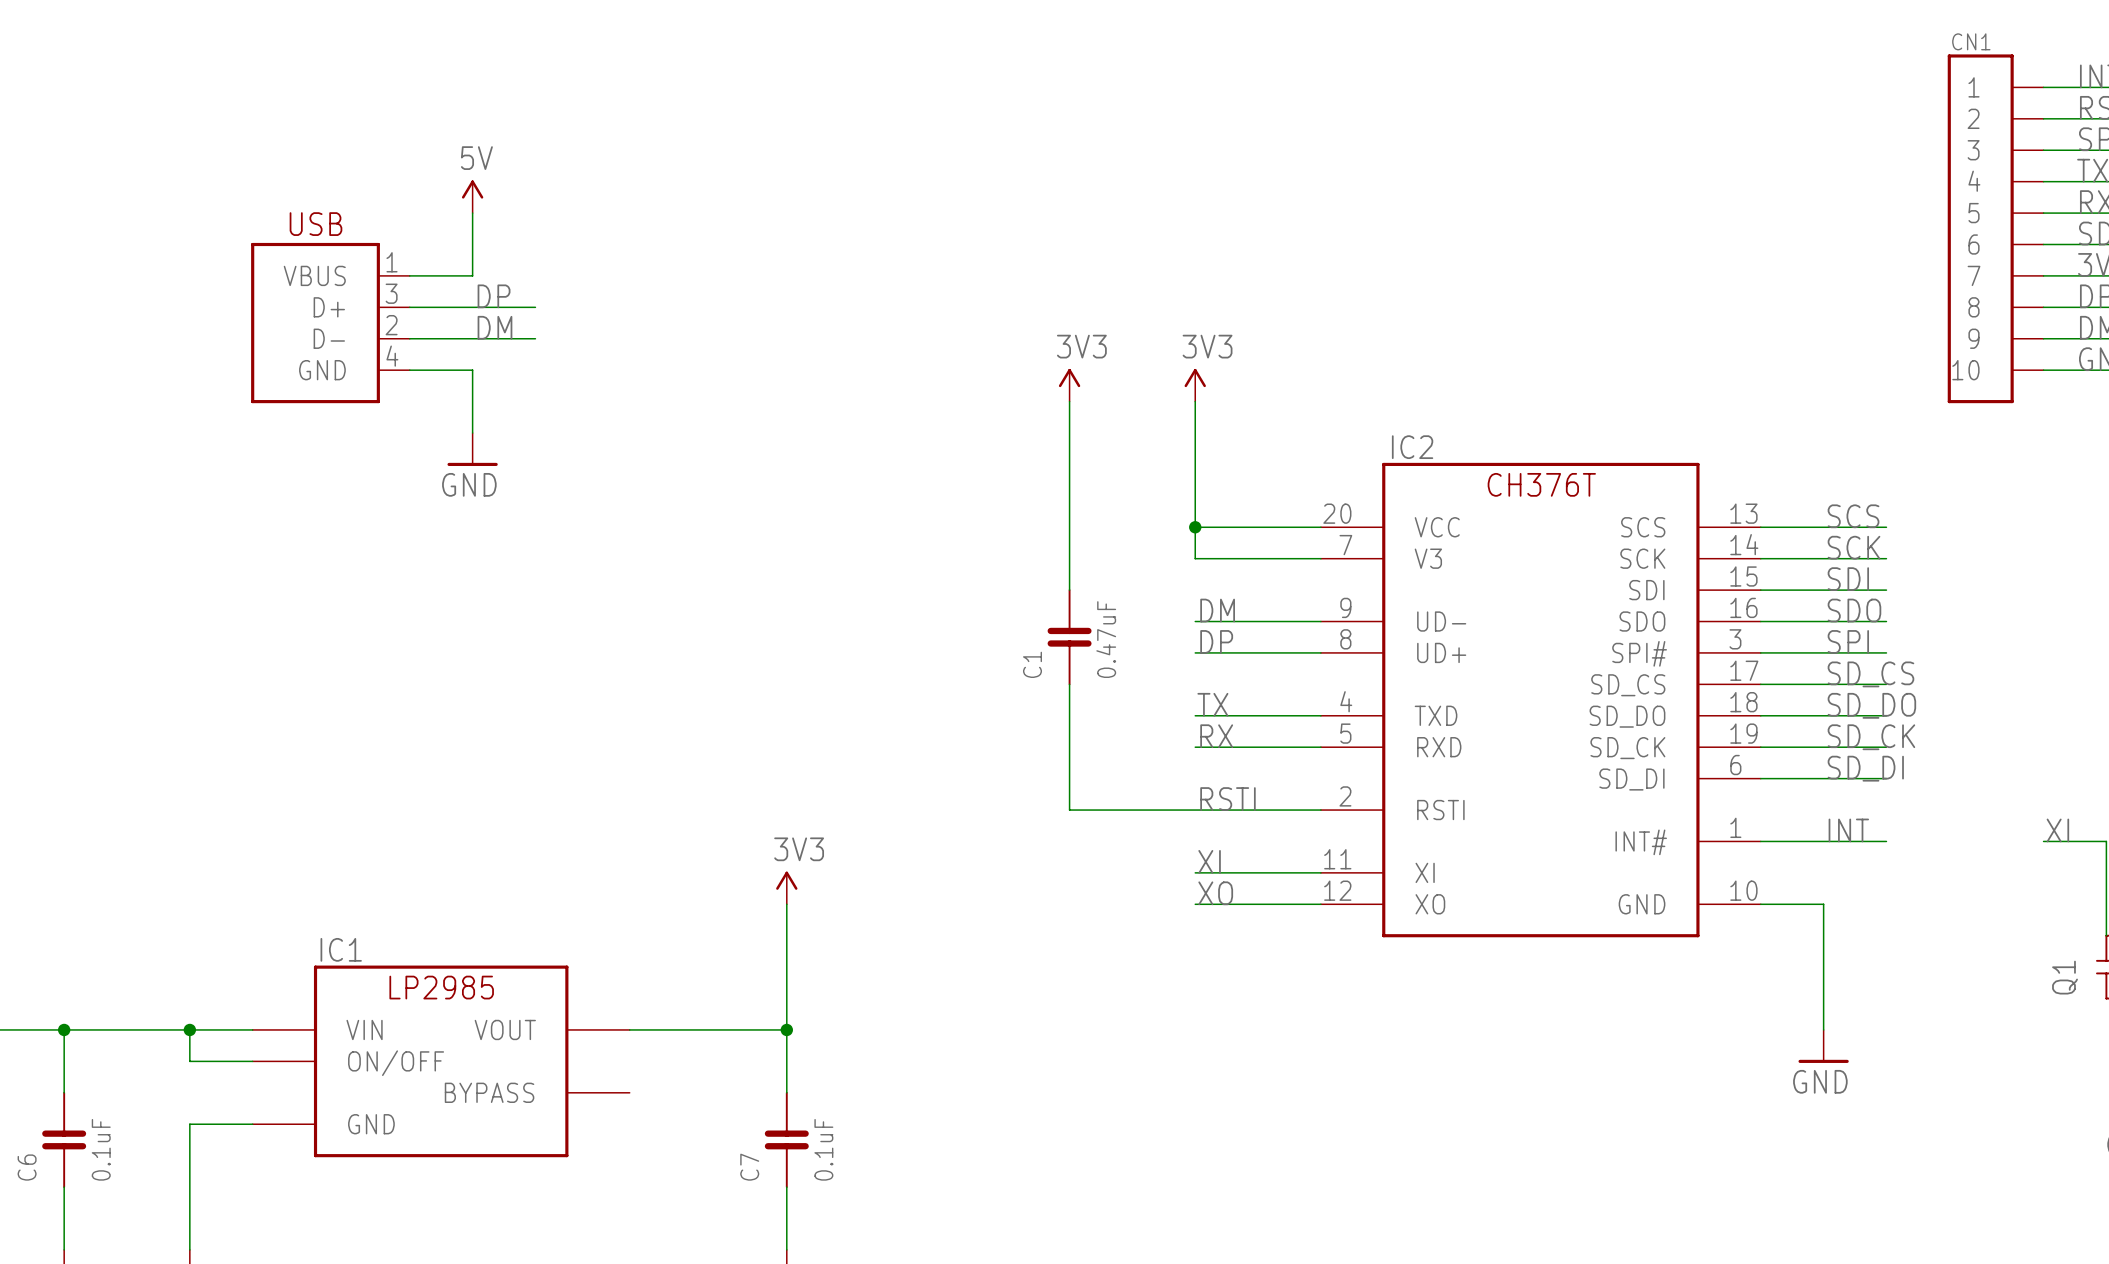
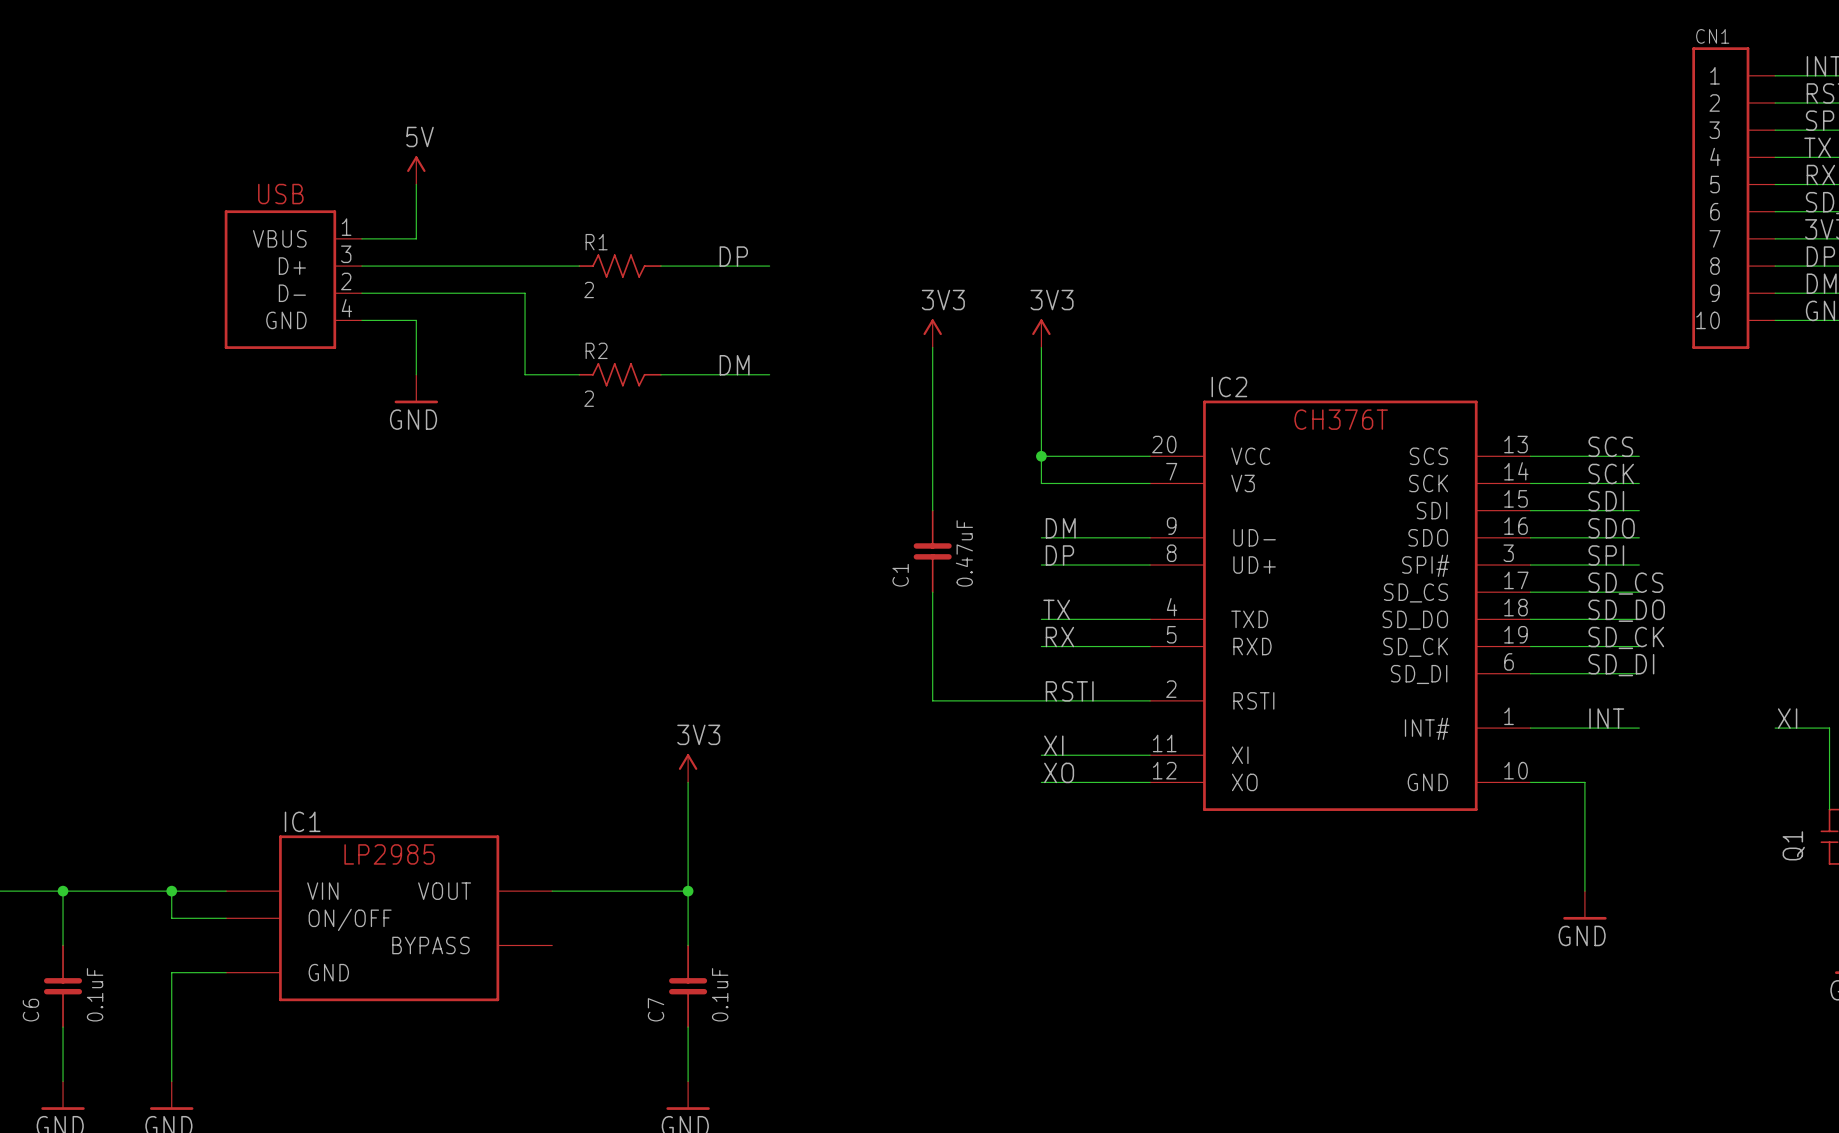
label: DP (494, 296) -> none
label: none -> DP (733, 256)
wire: none -> (470, 266) (579, 266)
R1: none -> 2 (620, 266)
wire: none -> (660, 266) (769, 266)
label: DM (494, 327) -> none
wire: none -> (470, 293) (525, 293) (525, 374) (579, 374)
label: none -> DM (734, 365)
R2: none -> 2 (620, 374)
wire: none -> (660, 374) (769, 374)

